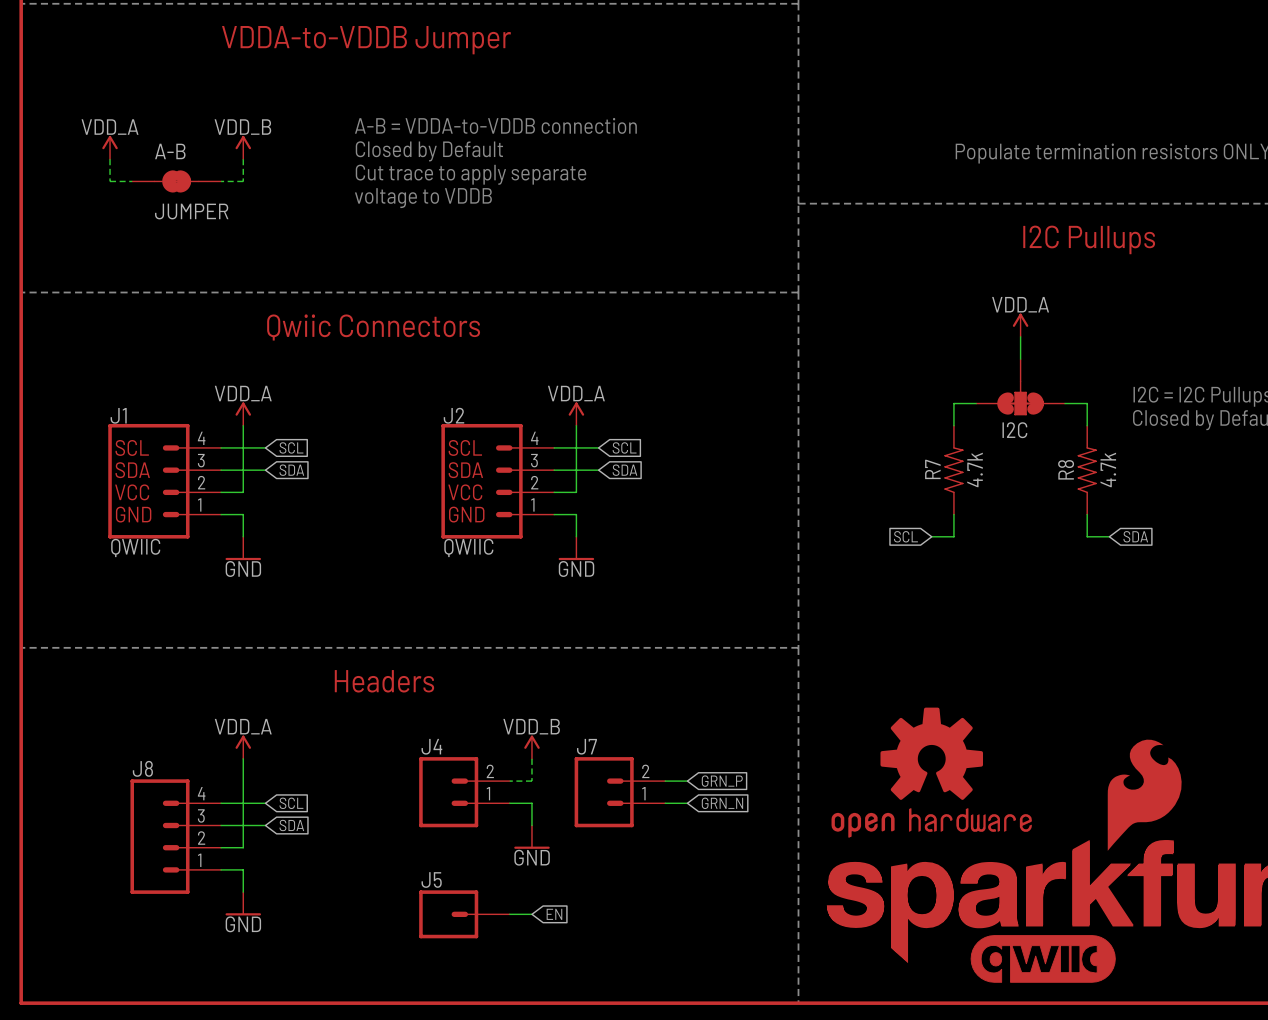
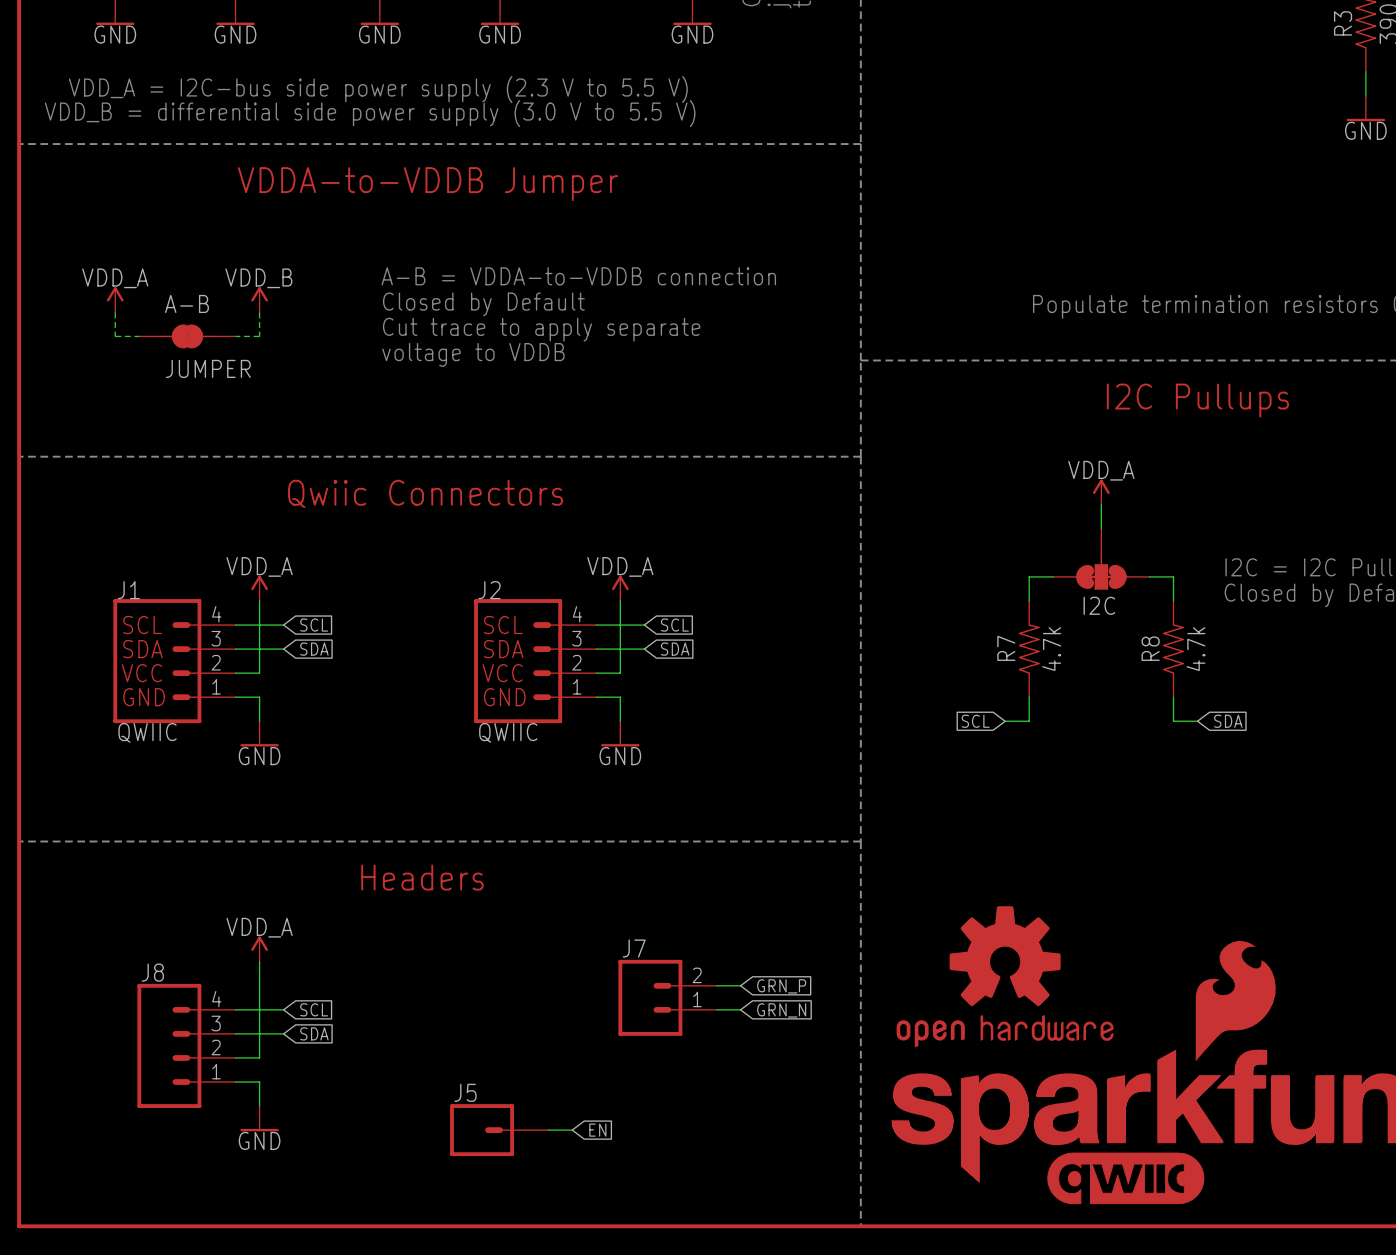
power symbol: VDD_B (531, 747) -> none
wire: (531, 758) (531, 781) (509, 781) -> none
J4: (464, 792) -> none
wire: (509, 803) (531, 803) (531, 825) -> none
power symbol: GND (531, 837) -> none

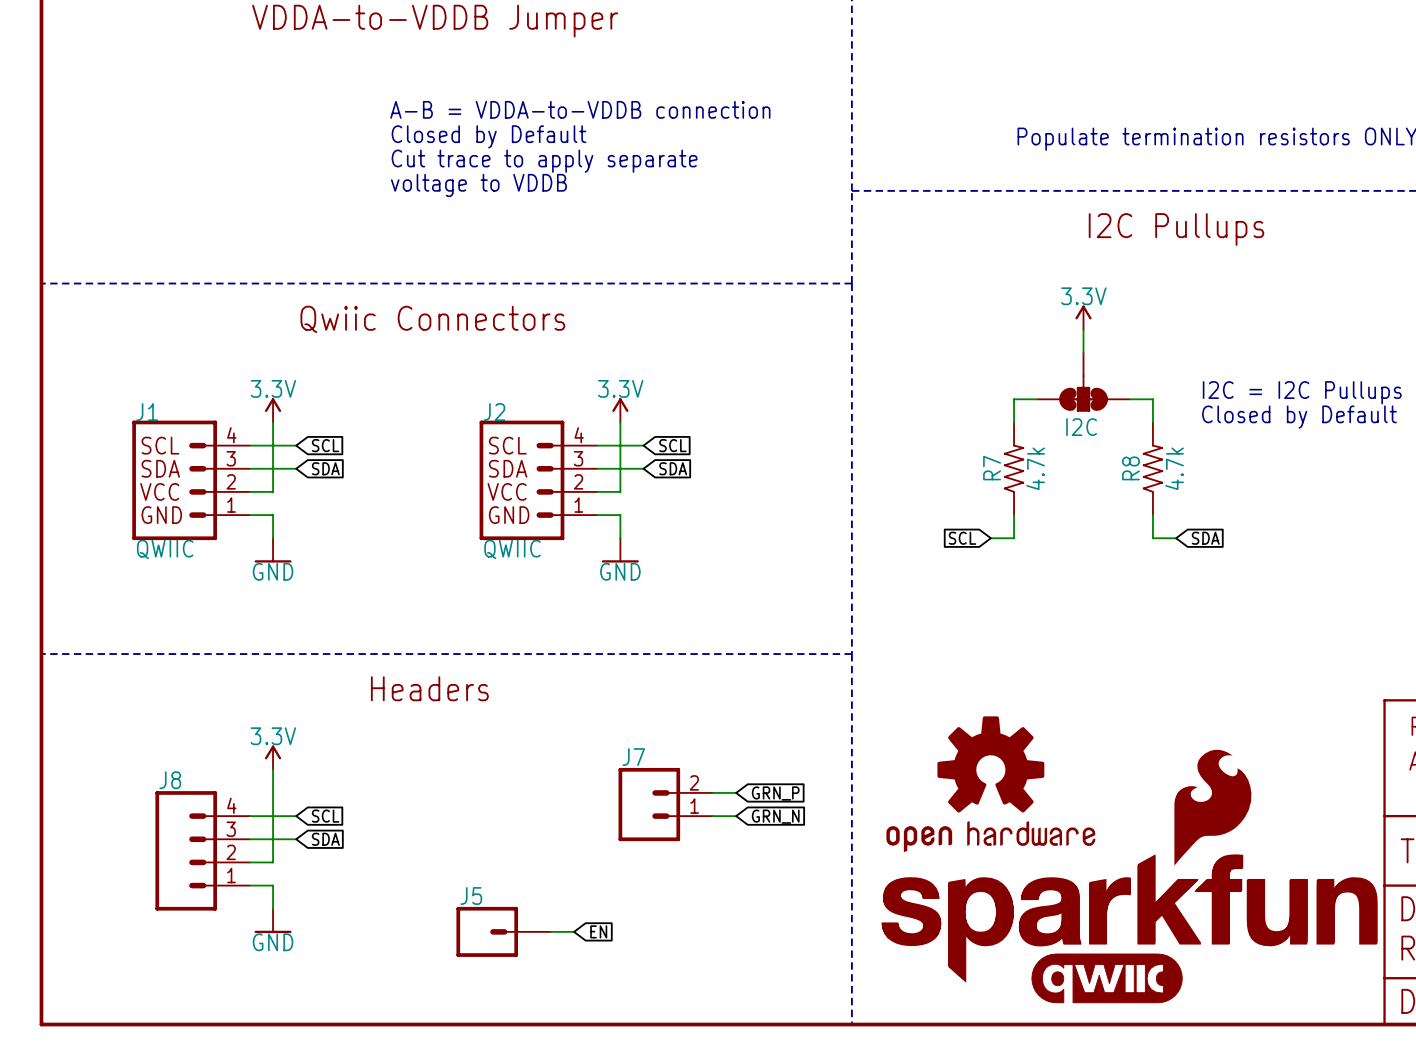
power symbol: VDD_A (115, 299) -> none
power symbol: VDD_B (259, 299) -> none
wire: (115, 312) (115, 336) (139, 336) -> none
wire: (259, 312) (259, 336) (235, 336) -> none
A-B: JUMPER (187, 336) -> none
power symbol: VDD_A (1101, 492) -> 3.3V (1083, 317)
power symbol: VDD_A (259, 588) -> 3.3V (273, 410)
power symbol: VDD_A (620, 588) -> 3.3V (620, 410)
power symbol: VDD_A (259, 949) -> 3.3V (273, 757)

